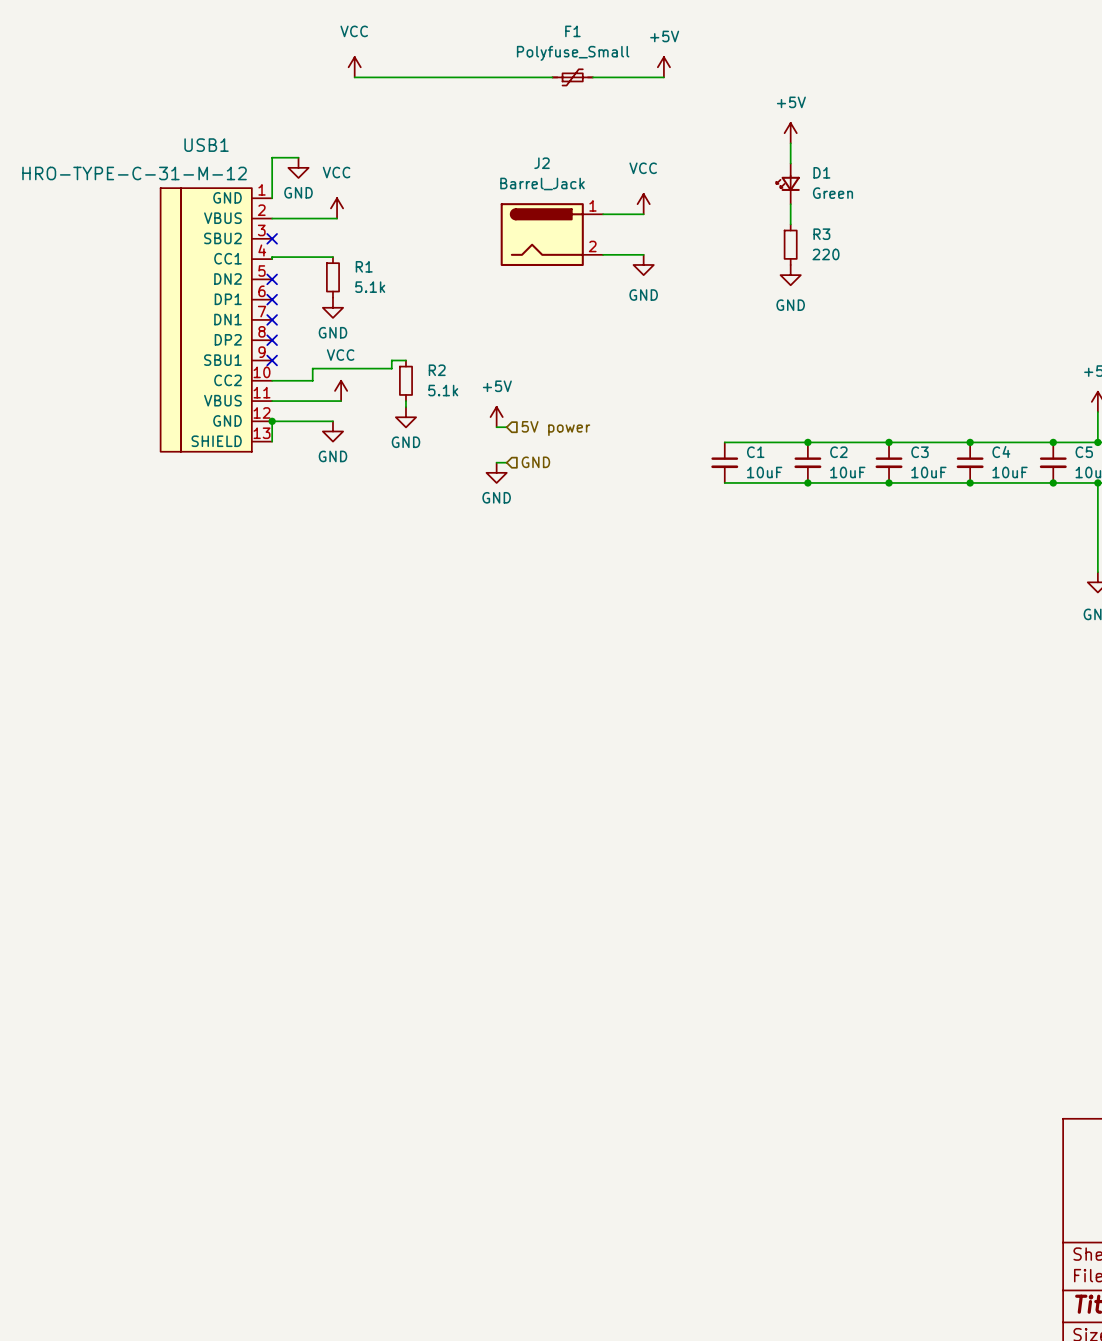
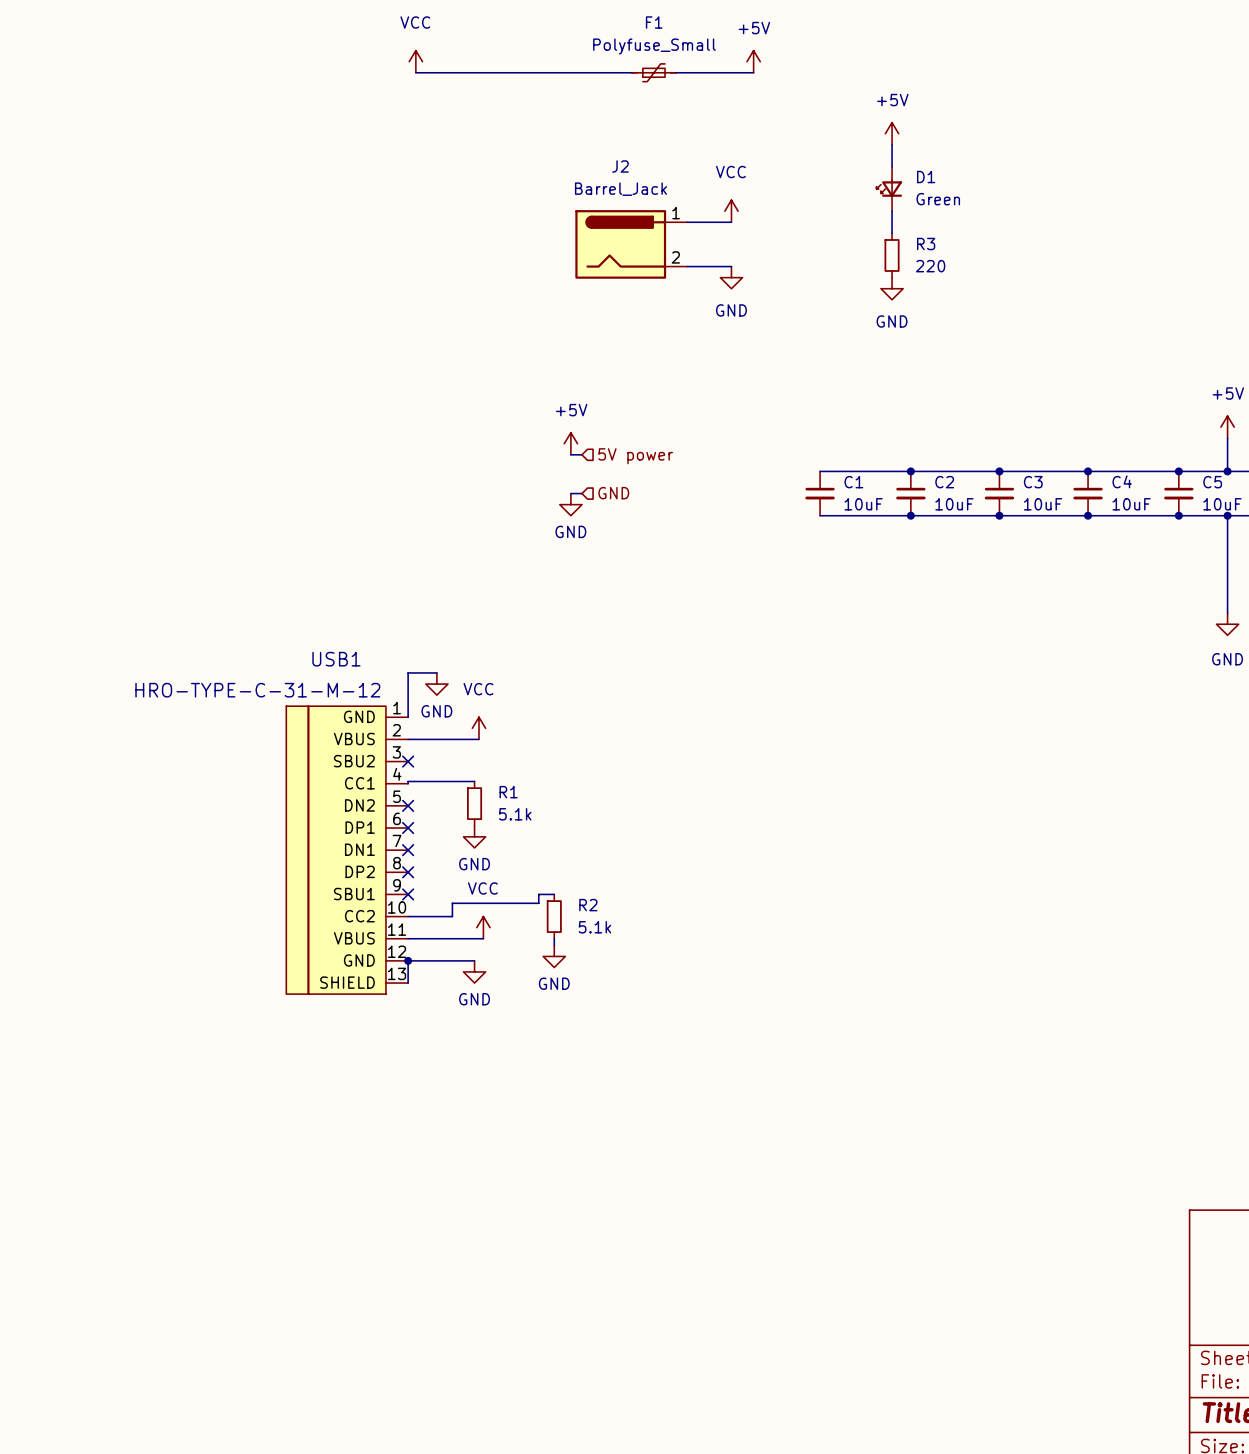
wire: (298, 157) (272, 157) (272, 198) -> none
power symbol: GND (298, 167) -> none
power symbol: VCC (337, 208) -> none
wire: (272, 218) (337, 218) -> none
no-connect mark: (272, 238) -> none
wire: (332, 257) (272, 257) (272, 259) -> none
R1 position: (332, 277) -> (474, 803)
no-connect mark: (272, 279) -> none
no-connect mark: (272, 299) -> none
power symbol: GND (332, 307) -> none
USB1 position: (216, 319) -> (347, 850)
no-connect mark: (272, 319) -> none
no-connect mark: (272, 340) -> none
no-connect mark: (272, 360) -> none
wire: (405, 360) (391, 360) (391, 368) (312, 368) (312, 380) (272, 380) -> none
R2 position: (405, 380) -> (554, 916)
power symbol: VCC (341, 390) -> none
wire: (272, 401) (341, 401) -> none
wire: (405, 401) (405, 407) -> none
power symbol: GND (405, 417) -> none
junction: (272, 421) -> none
wire: (332, 421) (272, 421) (272, 441) -> none
power symbol: GND (332, 431) -> none
wire: none -> (436, 672) (408, 672) (408, 717)
power symbol: none -> GND (436, 684)
power symbol: none -> VCC (478, 728)
wire: none -> (408, 739) (478, 739)
no-connect mark: none -> (408, 761)
wire: none -> (474, 781) (408, 781) (408, 783)
no-connect mark: none -> (408, 805)
no-connect mark: none -> (408, 828)
power symbol: none -> GND (474, 836)
no-connect mark: none -> (408, 850)
no-connect mark: none -> (408, 872)
no-connect mark: none -> (408, 894)
wire: none -> (554, 894) (538, 894) (538, 903) (452, 903) (452, 916) (408, 916)
power symbol: none -> VCC (483, 927)
wire: none -> (408, 938) (483, 938)
wire: none -> (554, 938) (554, 945)
power symbol: none -> GND (554, 956)
junction: none -> (408, 960)
wire: none -> (474, 960) (408, 960) (408, 983)
power symbol: none -> GND (474, 971)

